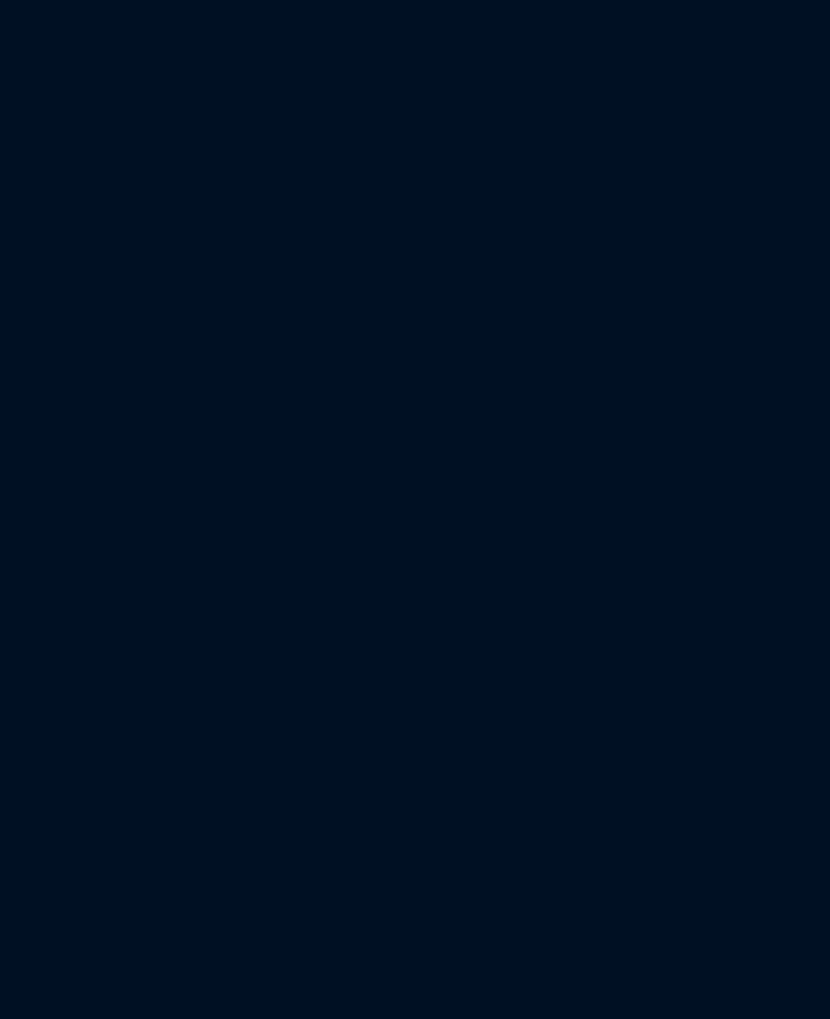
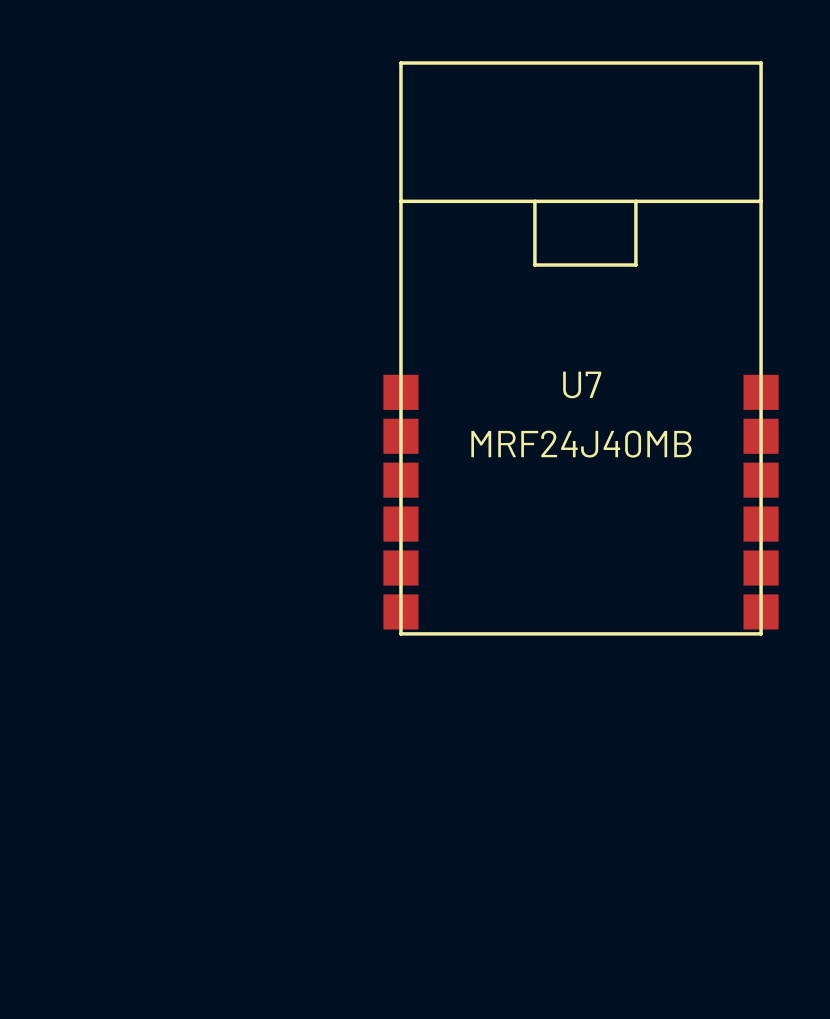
U7: none -> MRF24J40MB (581, 348)

